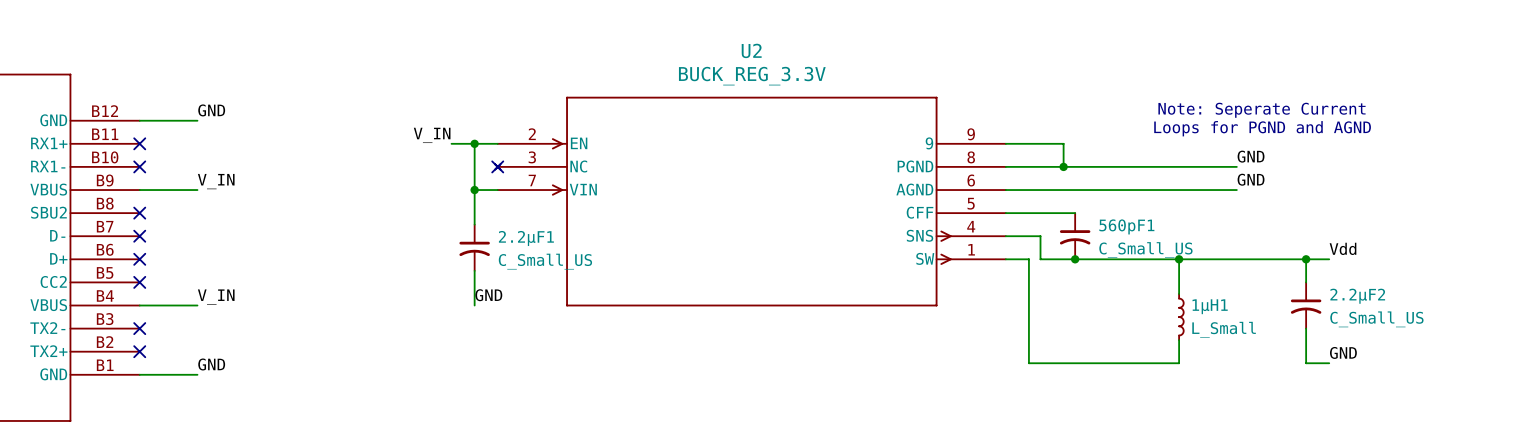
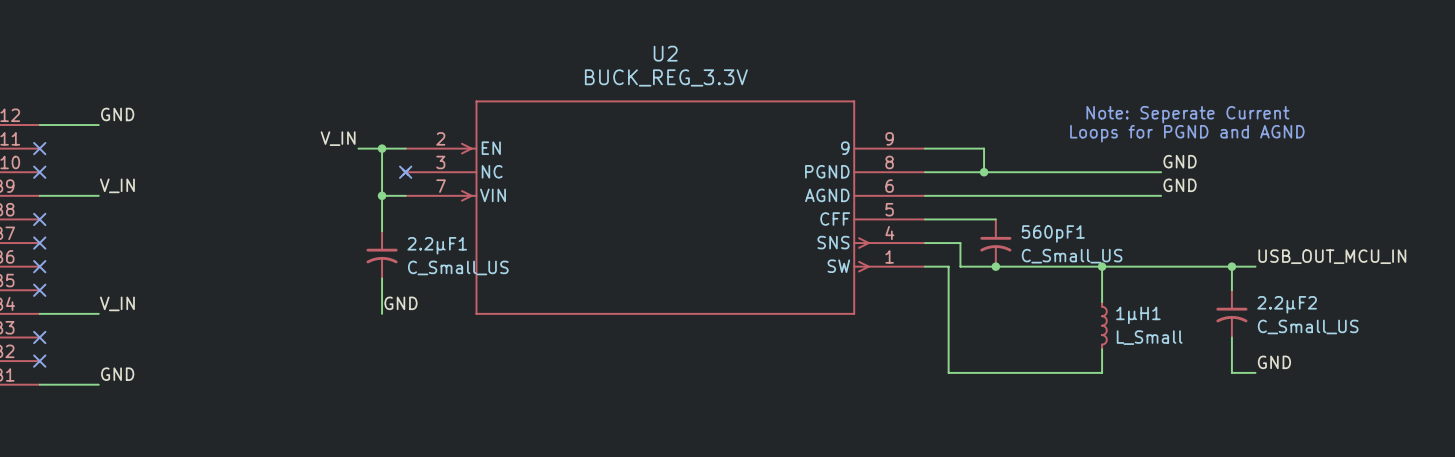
label: Vdd (1343, 248) -> USB_OUT_MCU_IN (1332, 256)

